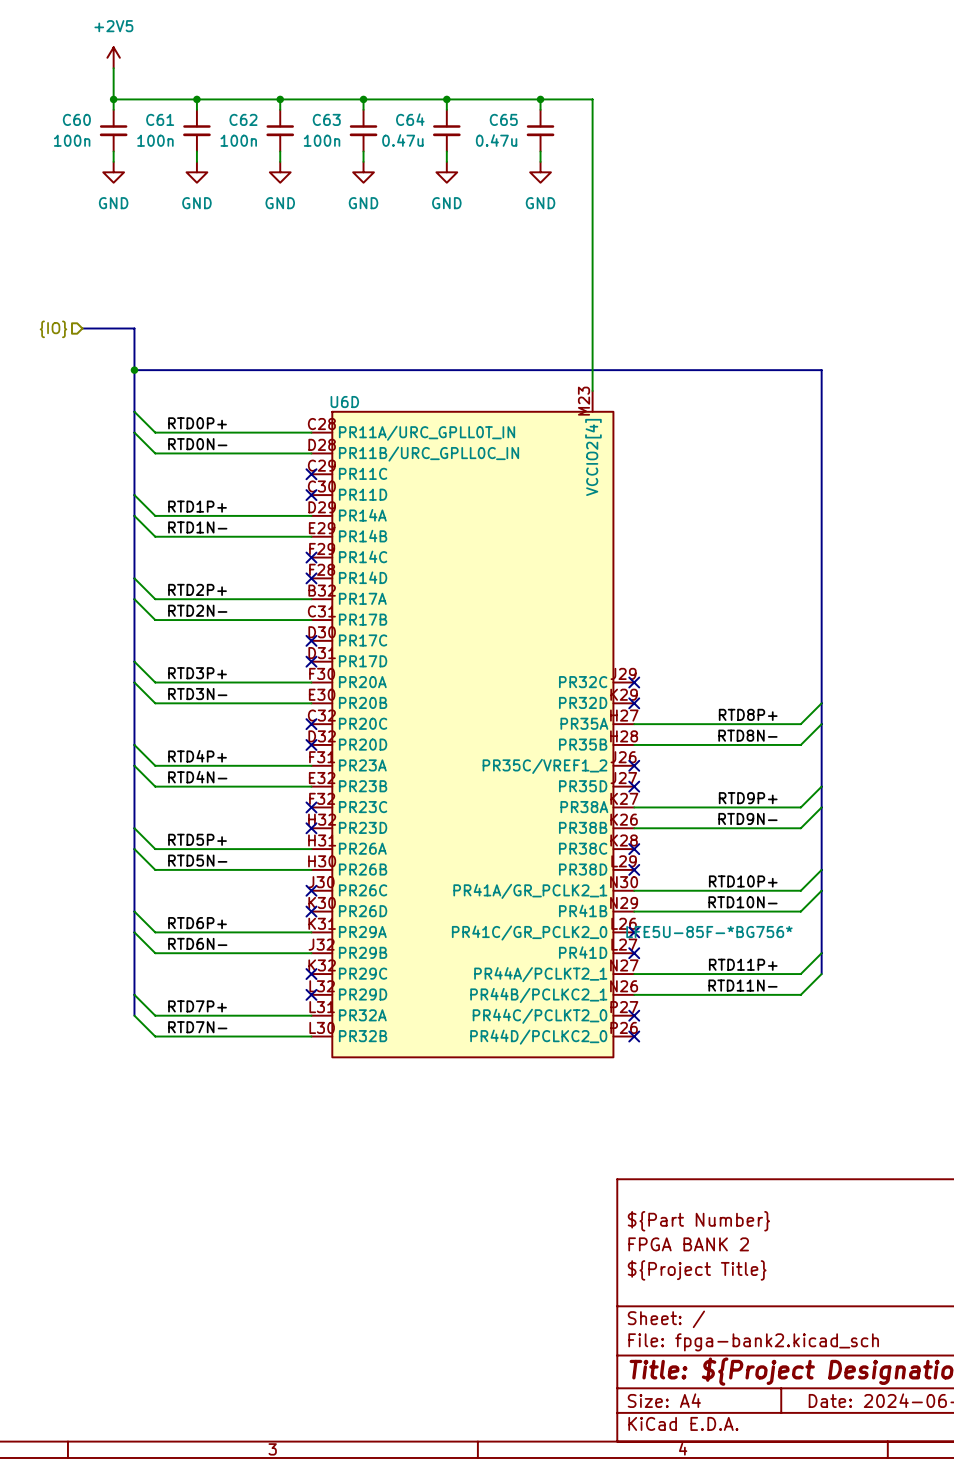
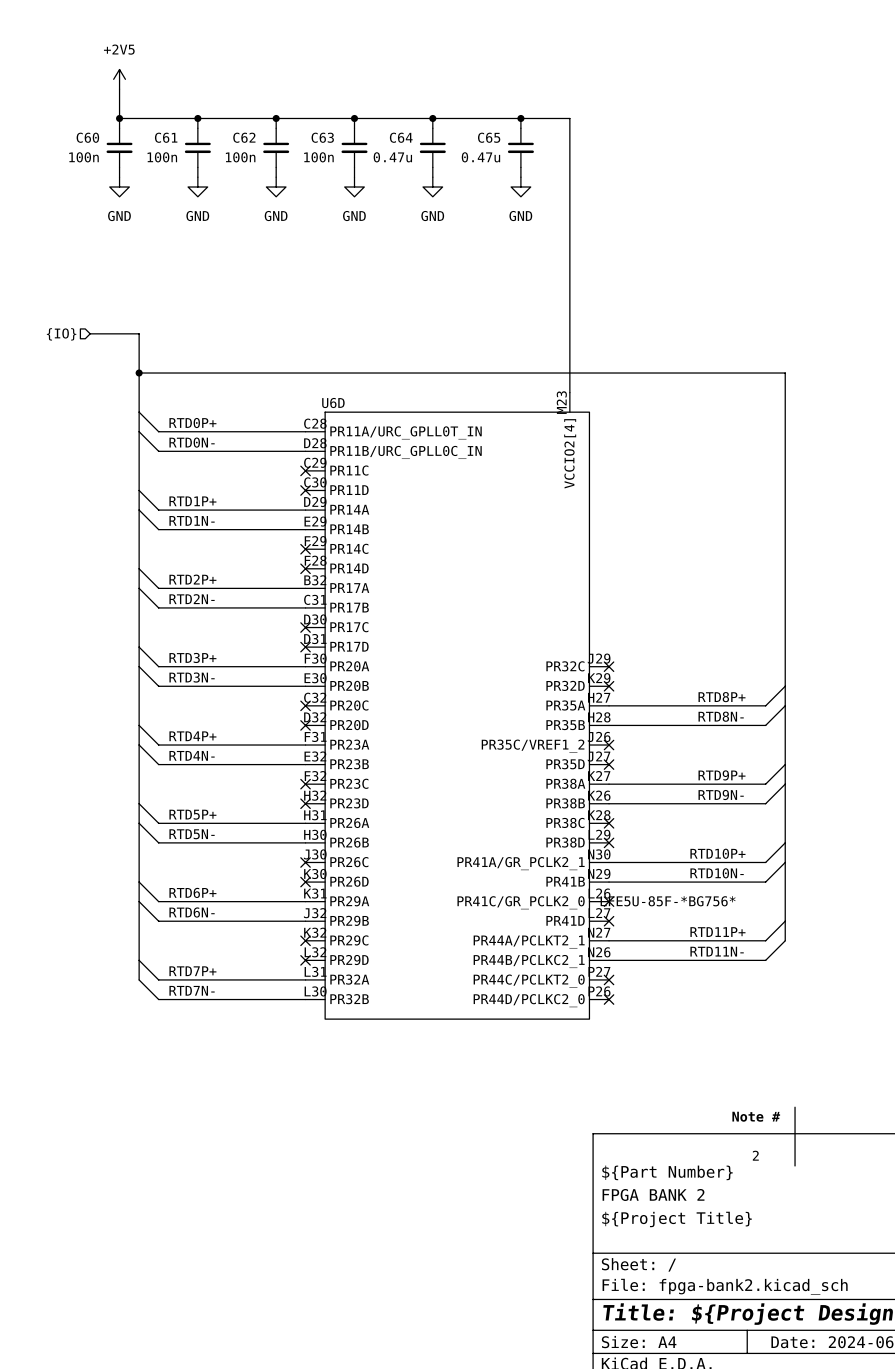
line: none -> (795, 1107) (795, 1165)
text: none -> Note # (756, 1116)
text: none -> 2 (755, 1155)

